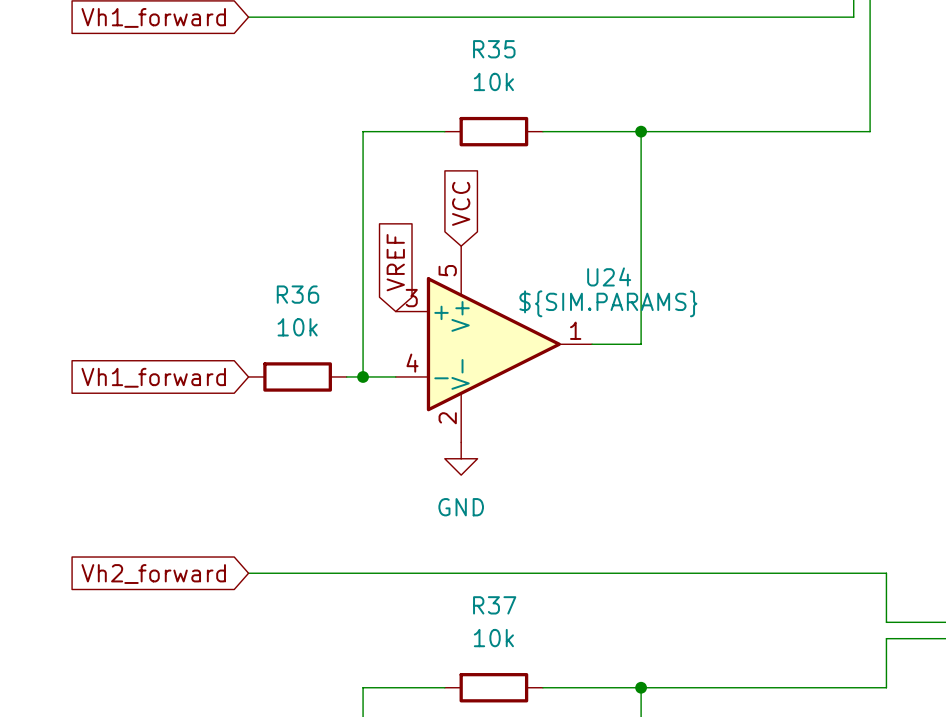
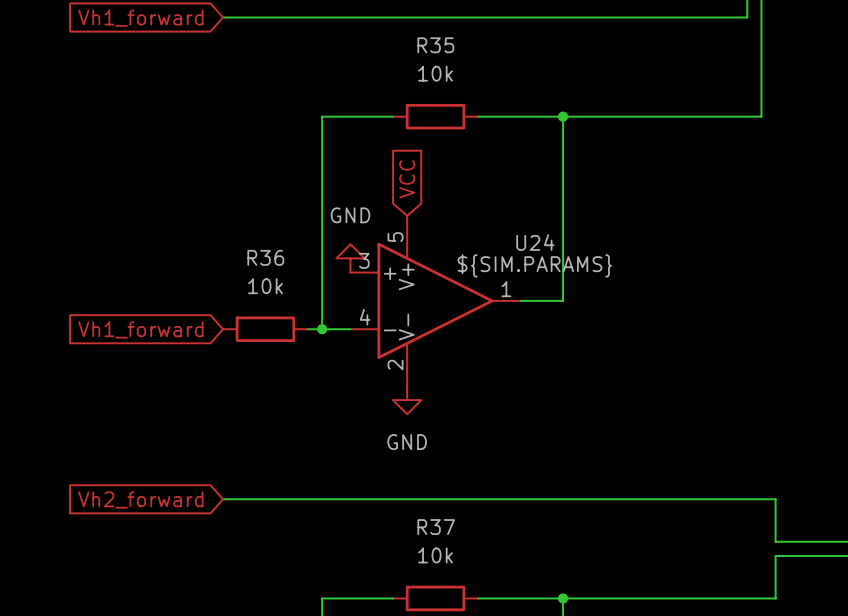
global label: VREF (395, 262) -> none
power symbol: none -> GND (350, 258)

